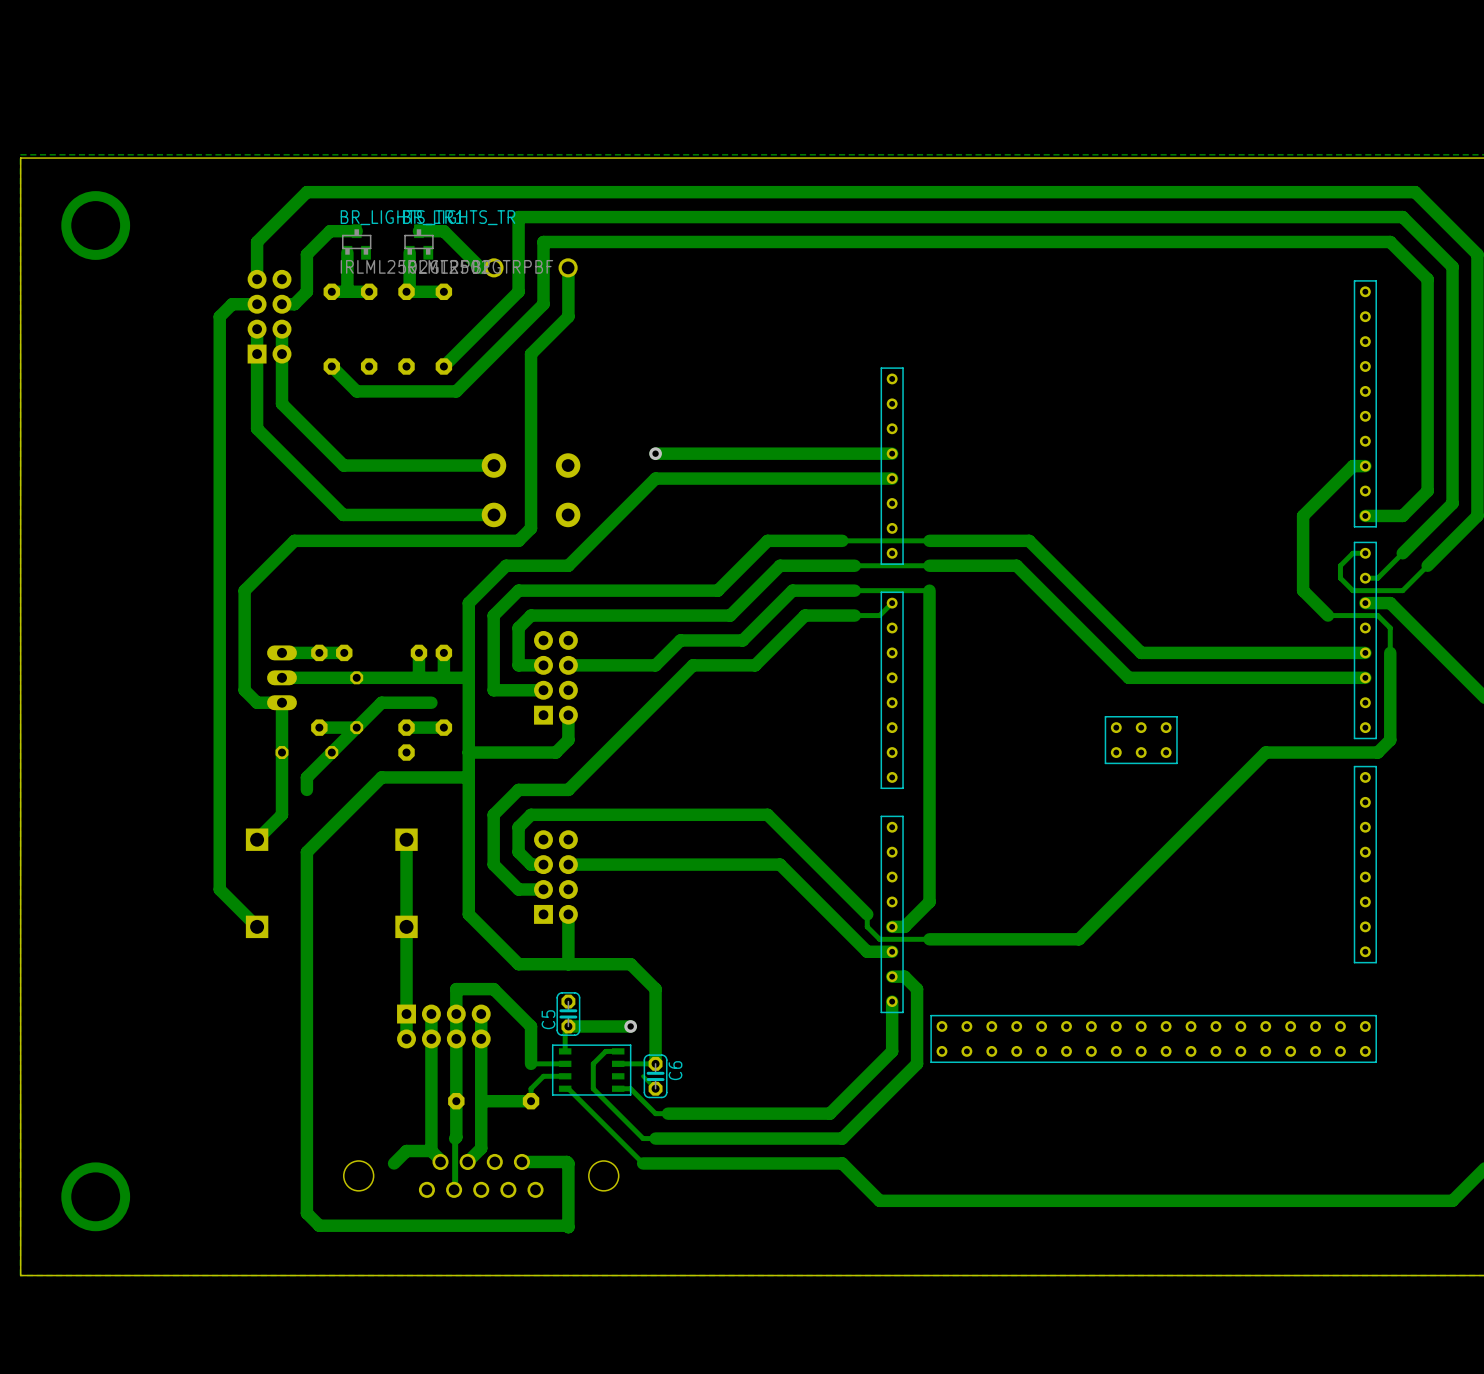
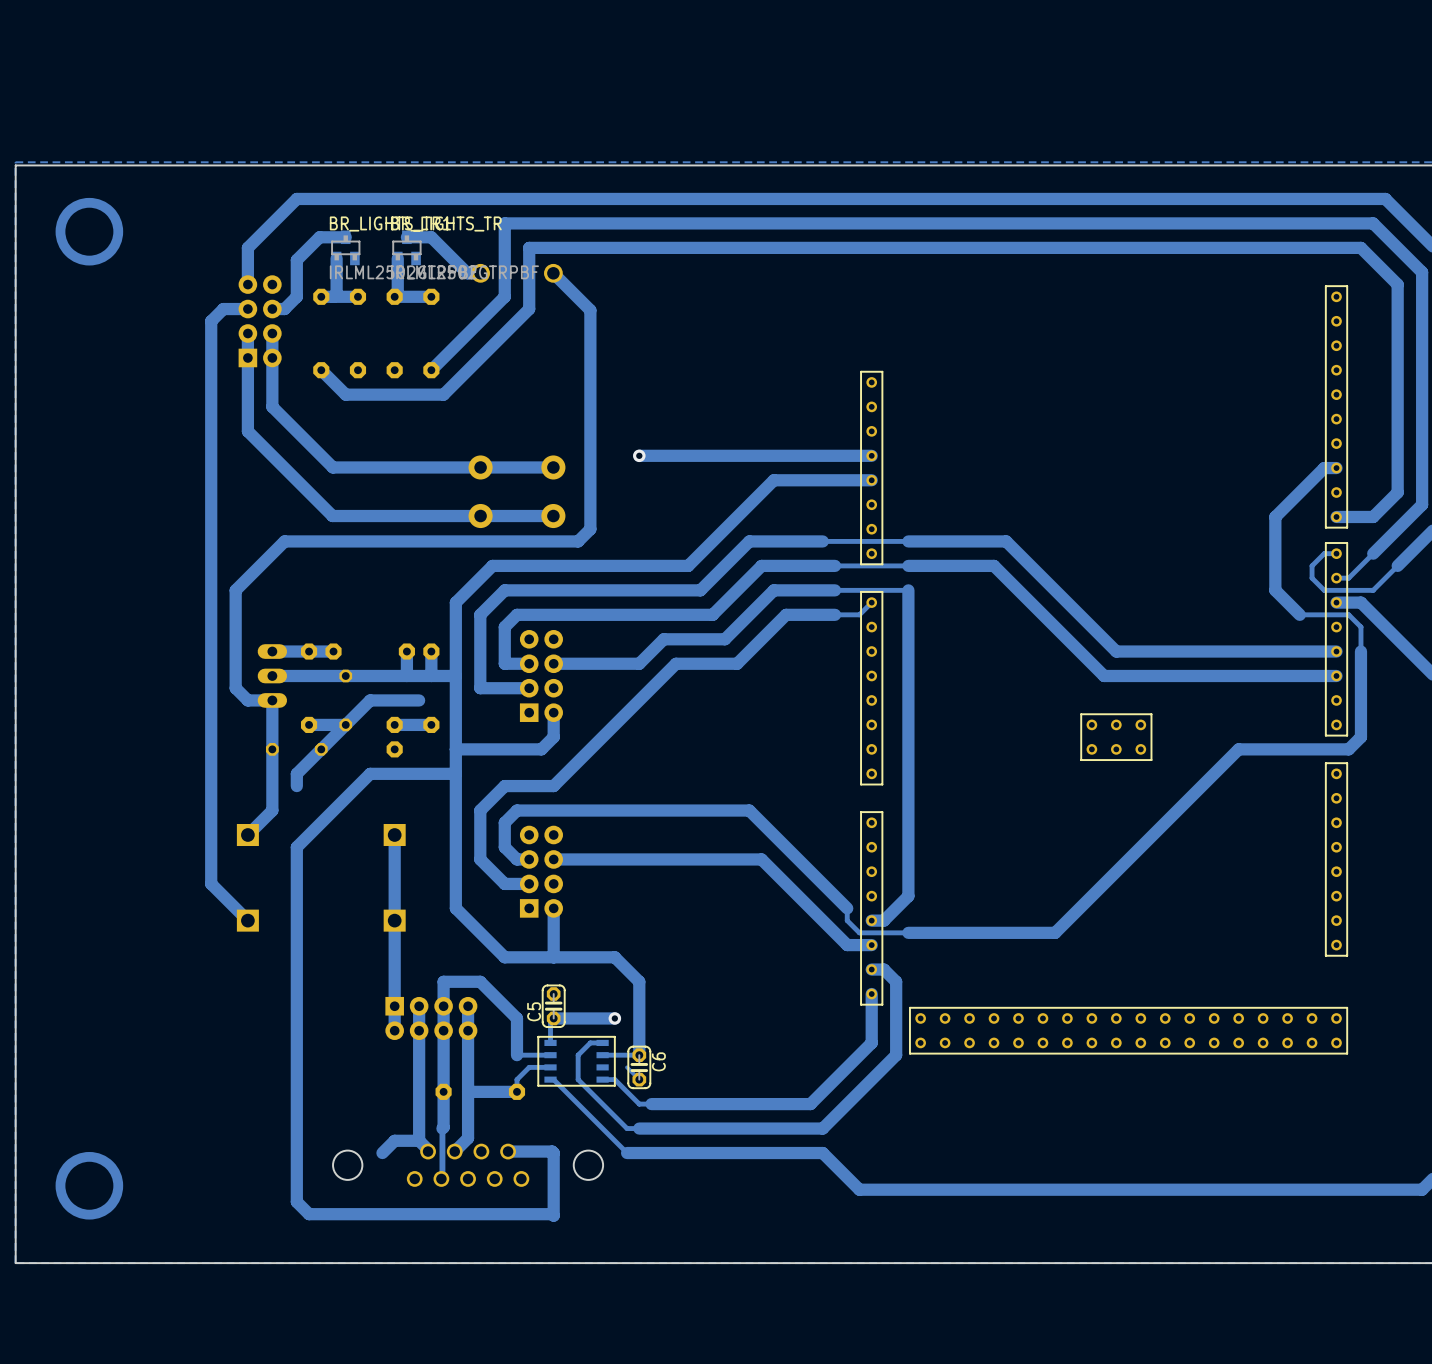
track: (568, 268) (568, 316) (531, 354) (531, 528) (518, 540) -> (553, 273) (590, 310) (590, 529)
track: none -> (553, 467) (480, 467)
track: (792, 478) (655, 478) (605, 528) -> (773, 480) (688, 565) (553, 565)
track: none -> (553, 516) (480, 516)
track: (593, 540) (568, 565) -> (578, 541) (504, 541)

